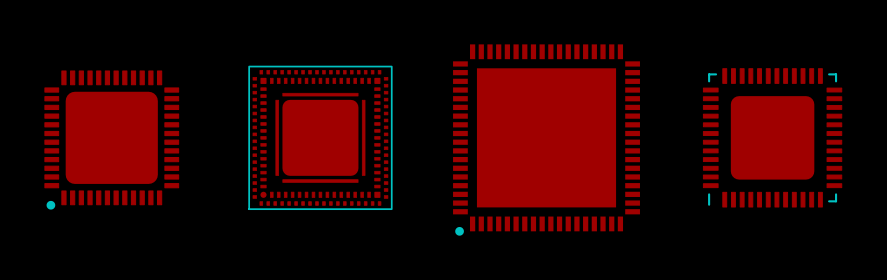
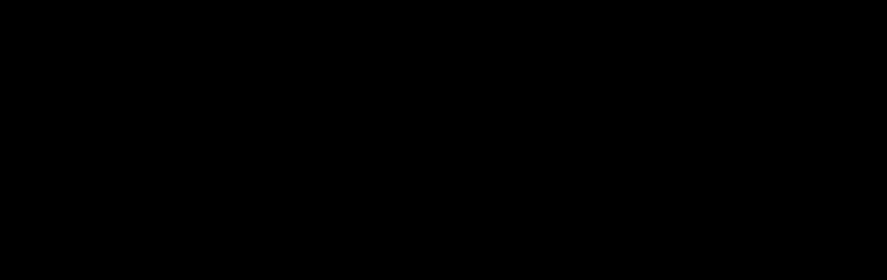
part: (320, 137) -> none
part: (772, 137) -> none
part: (111, 140) -> none
part: (546, 140) -> none

